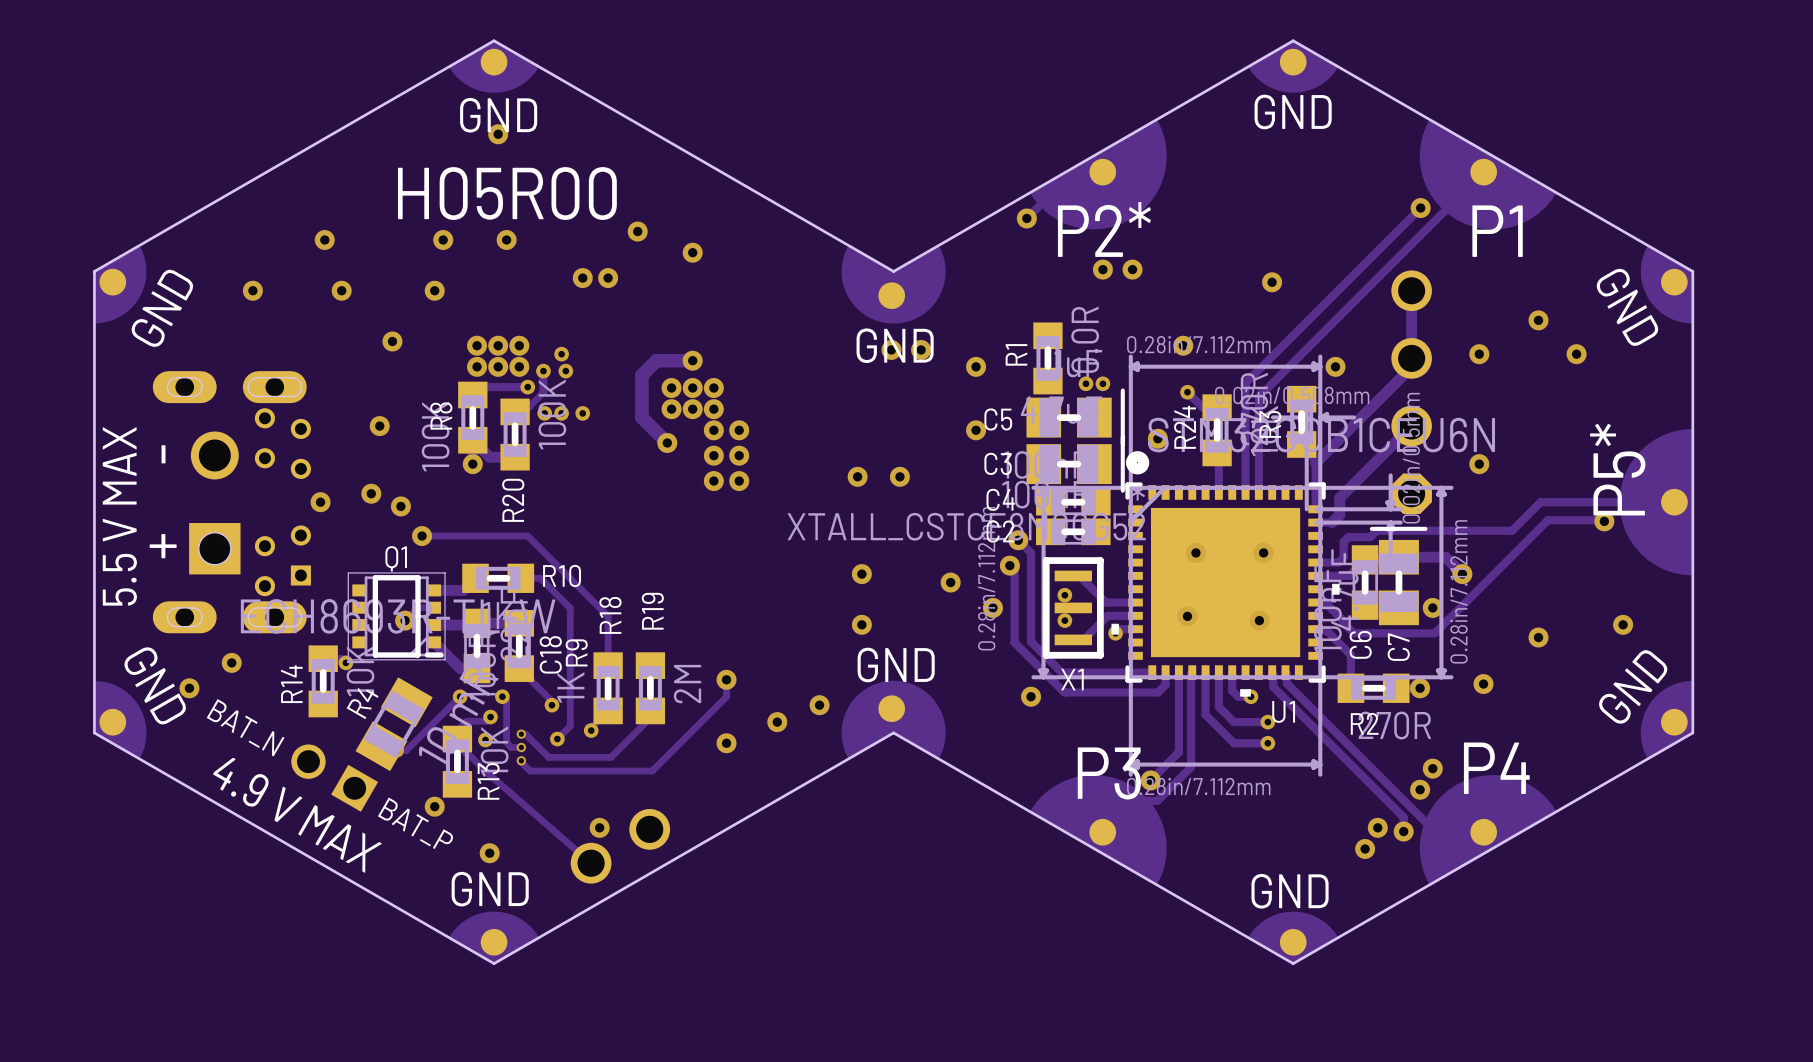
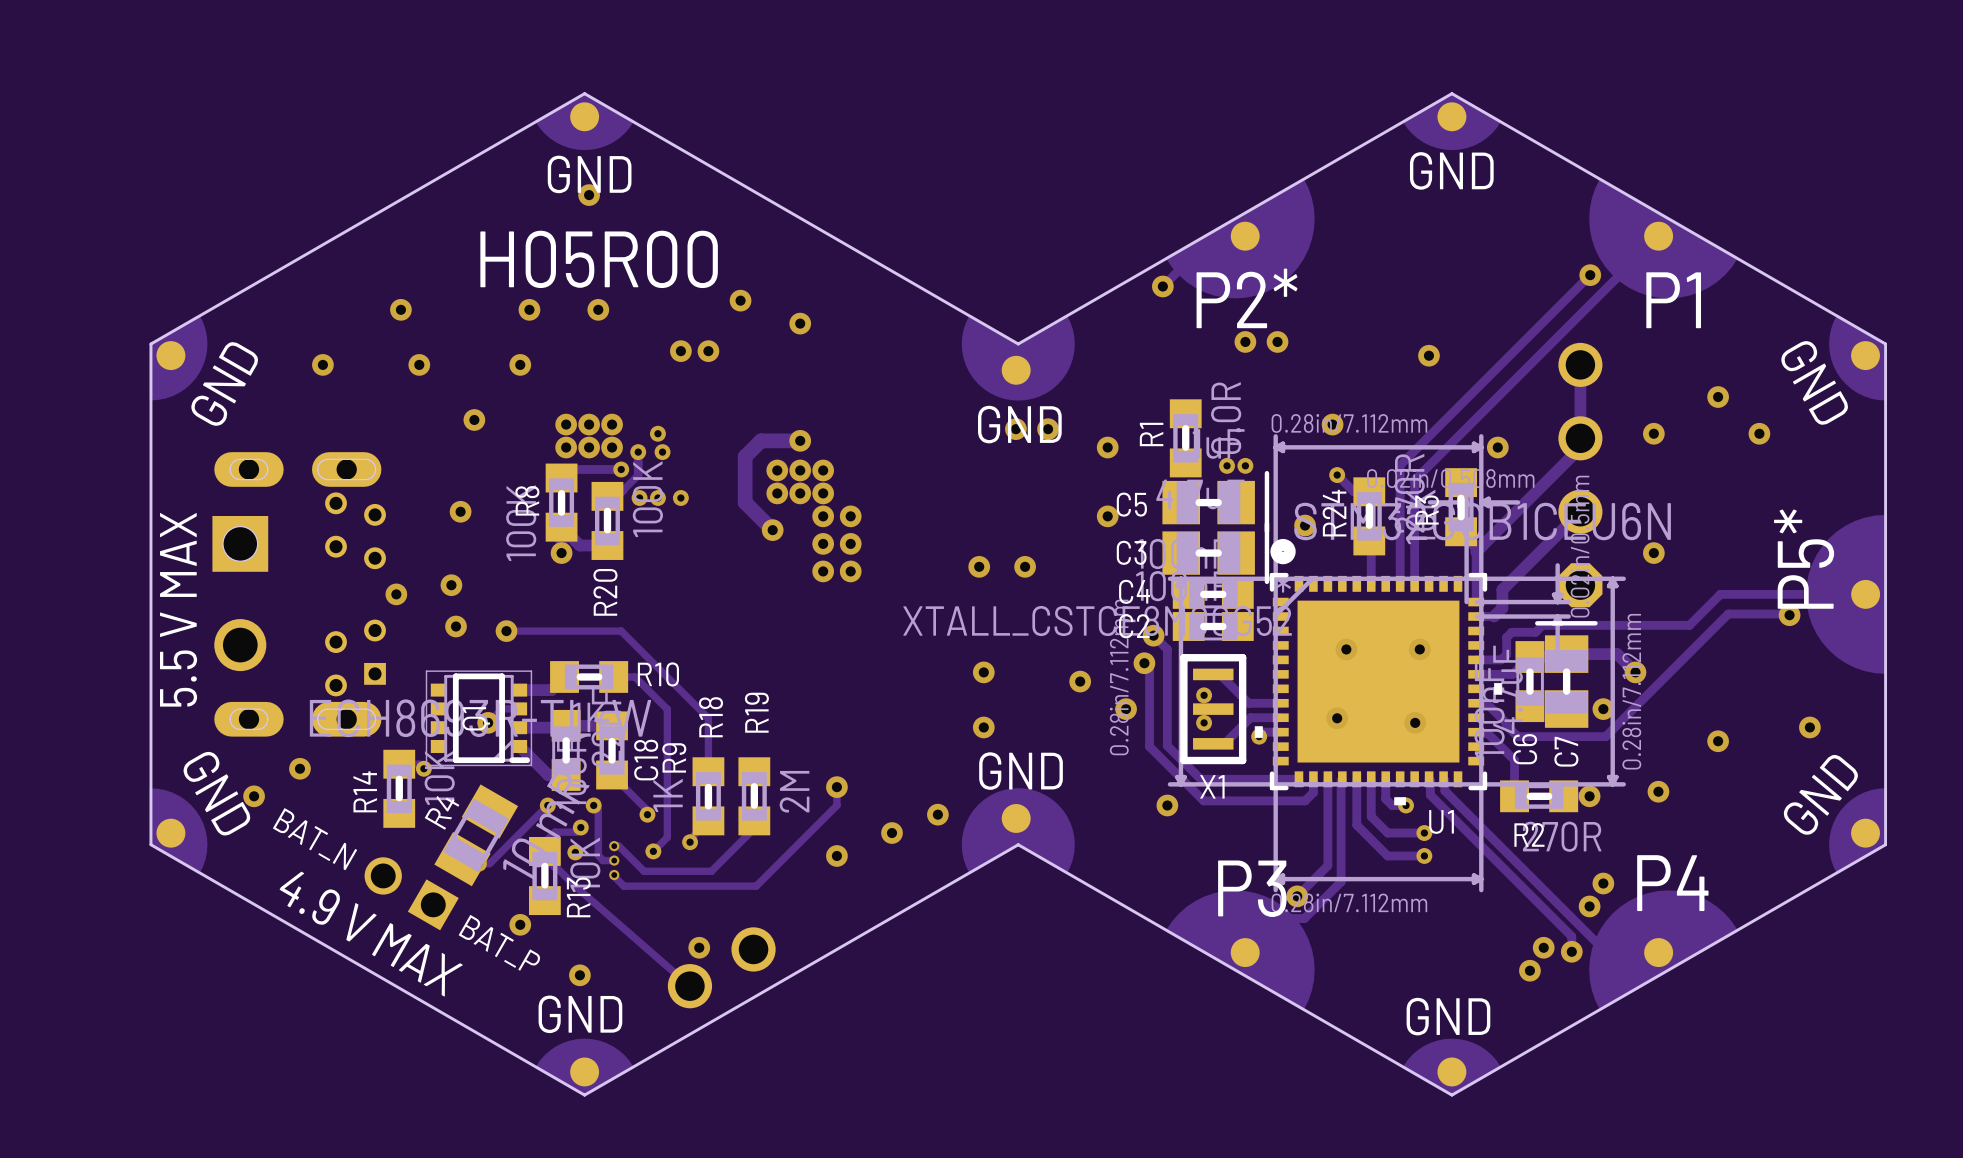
text: - (163, 454) -> none
part rotation: 0° (214, 502) -> 180° (240, 593)
via position: (400, 506) -> (456, 626)
text: + (163, 546) -> none
Q1 name rotation: 0° (396, 558) -> 90° counterclockwise (476, 718)
Q1 name position: Q1 (396, 558) -> Q1 (476, 718)

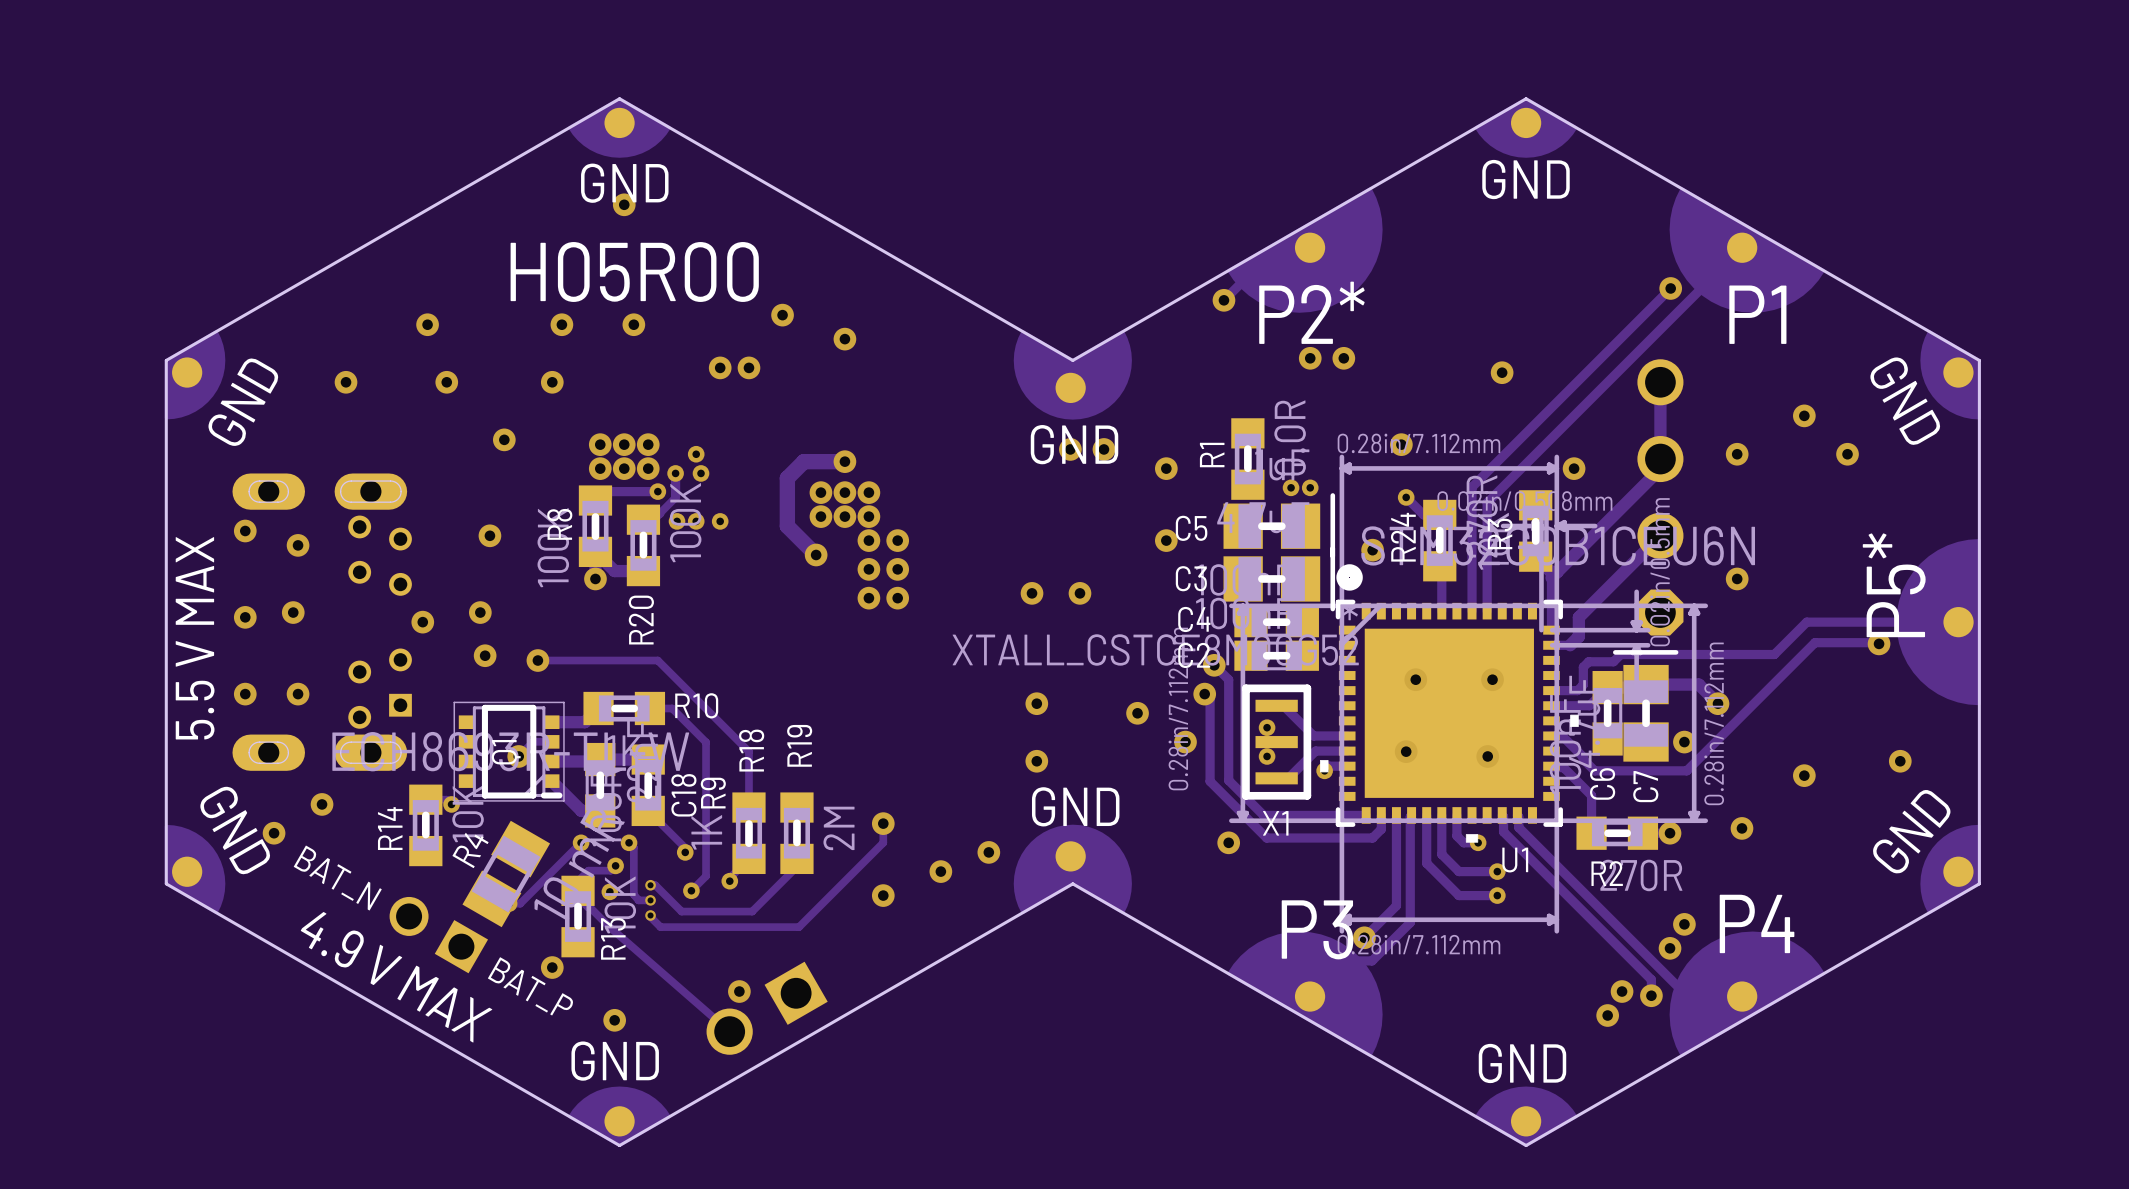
via: none -> (245, 531)
via: none -> (298, 545)
via: none -> (293, 612)
via: none -> (245, 617)
part: (240, 593) -> none
via: none -> (245, 694)
via: none -> (298, 694)
part footprint: [667, 927, 776, 1009] -> [706, 961, 828, 1055]

